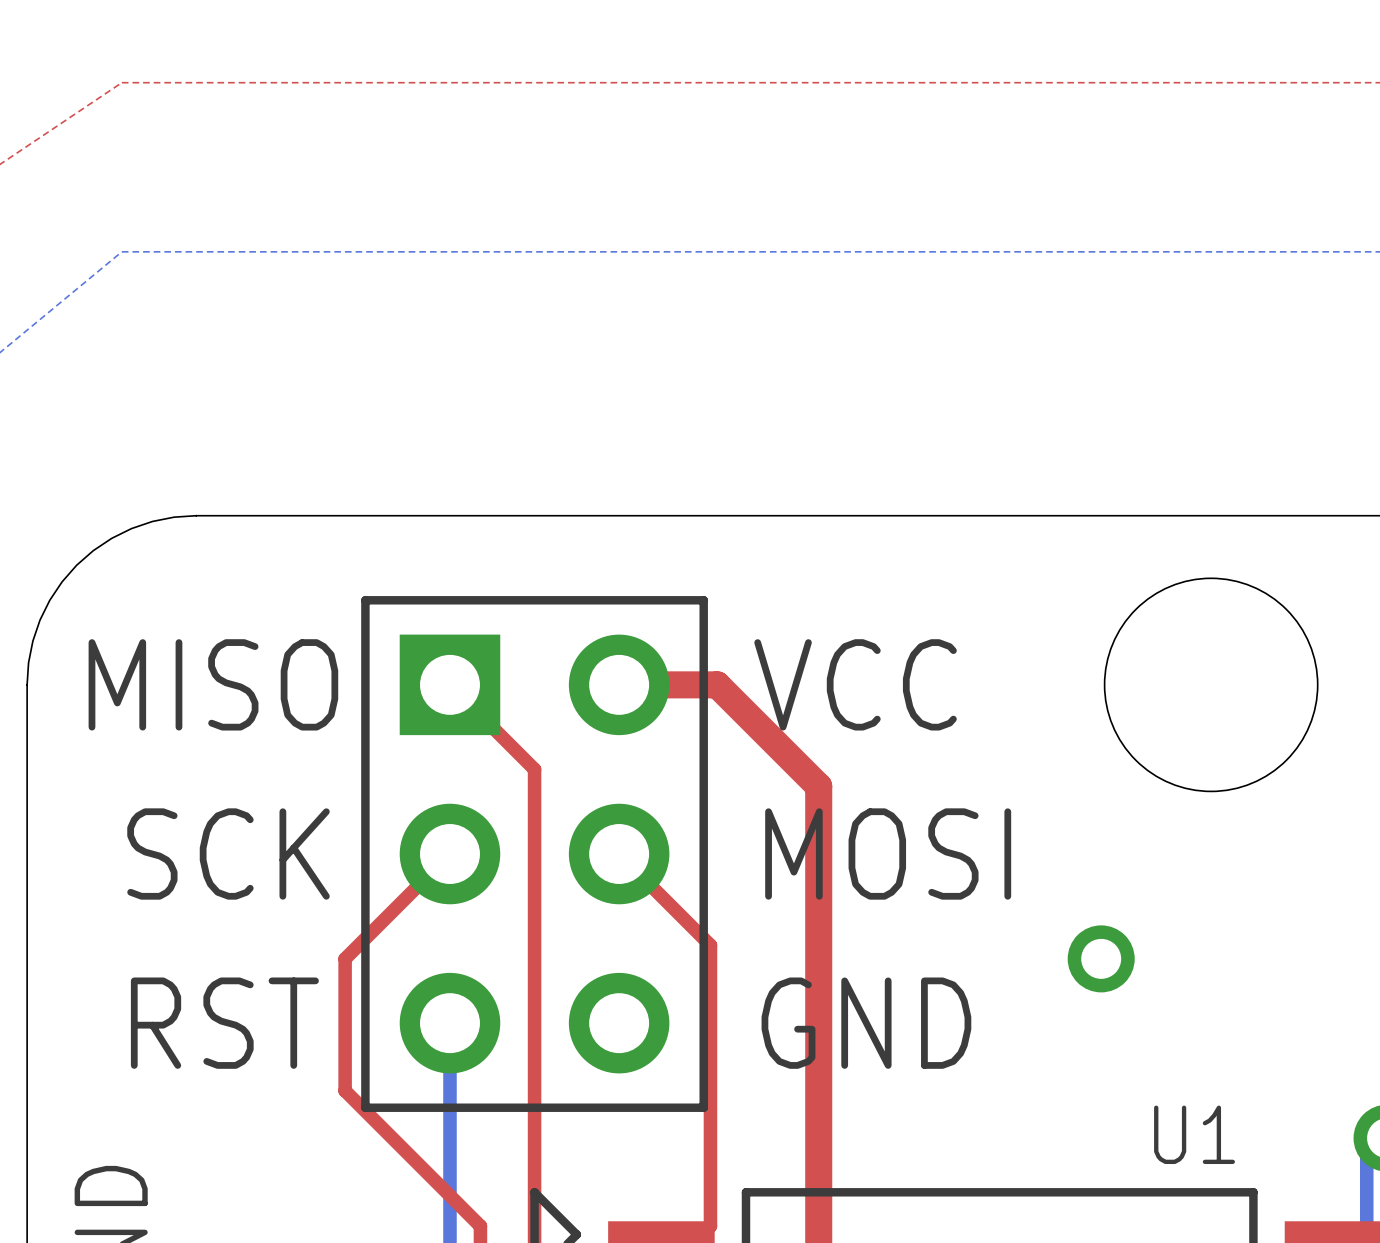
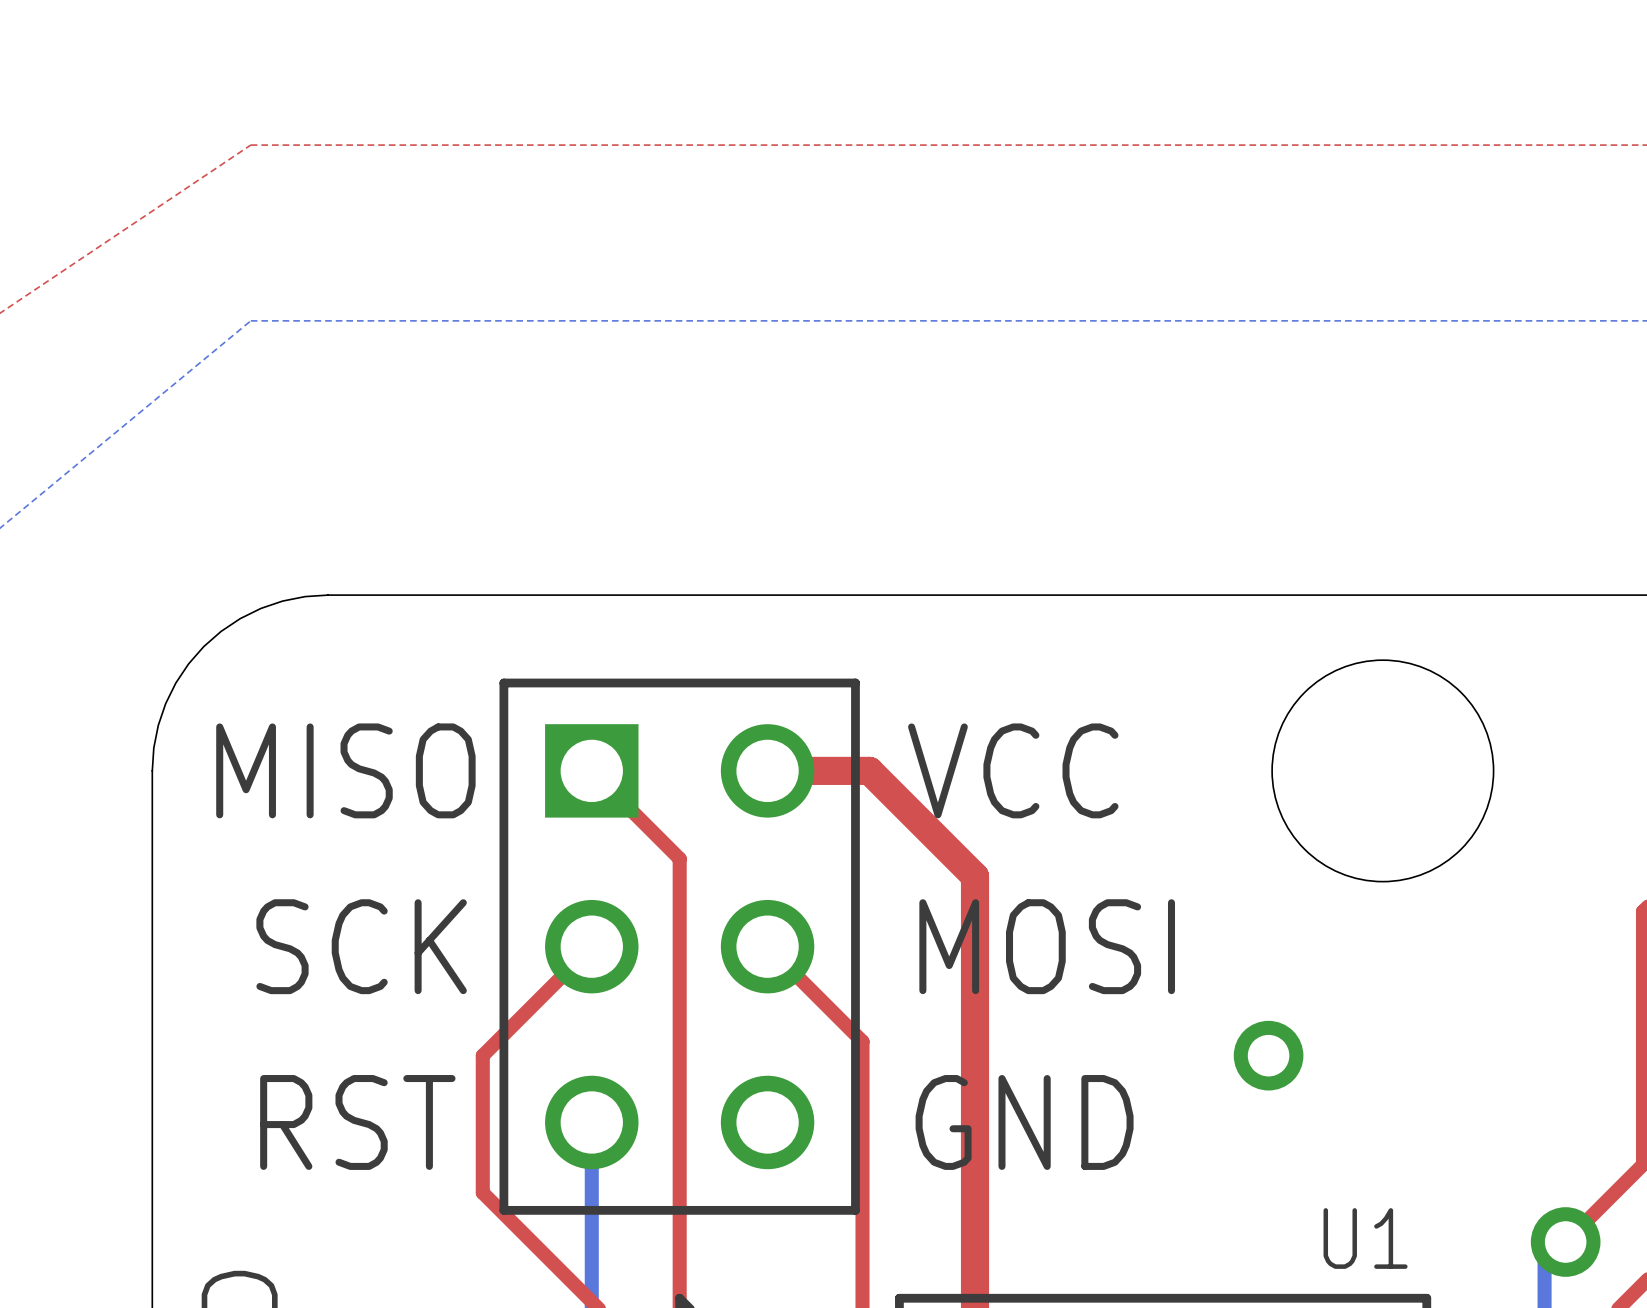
part footprint: [361, 596, 708, 1112] -> [499, 678, 860, 1215]

